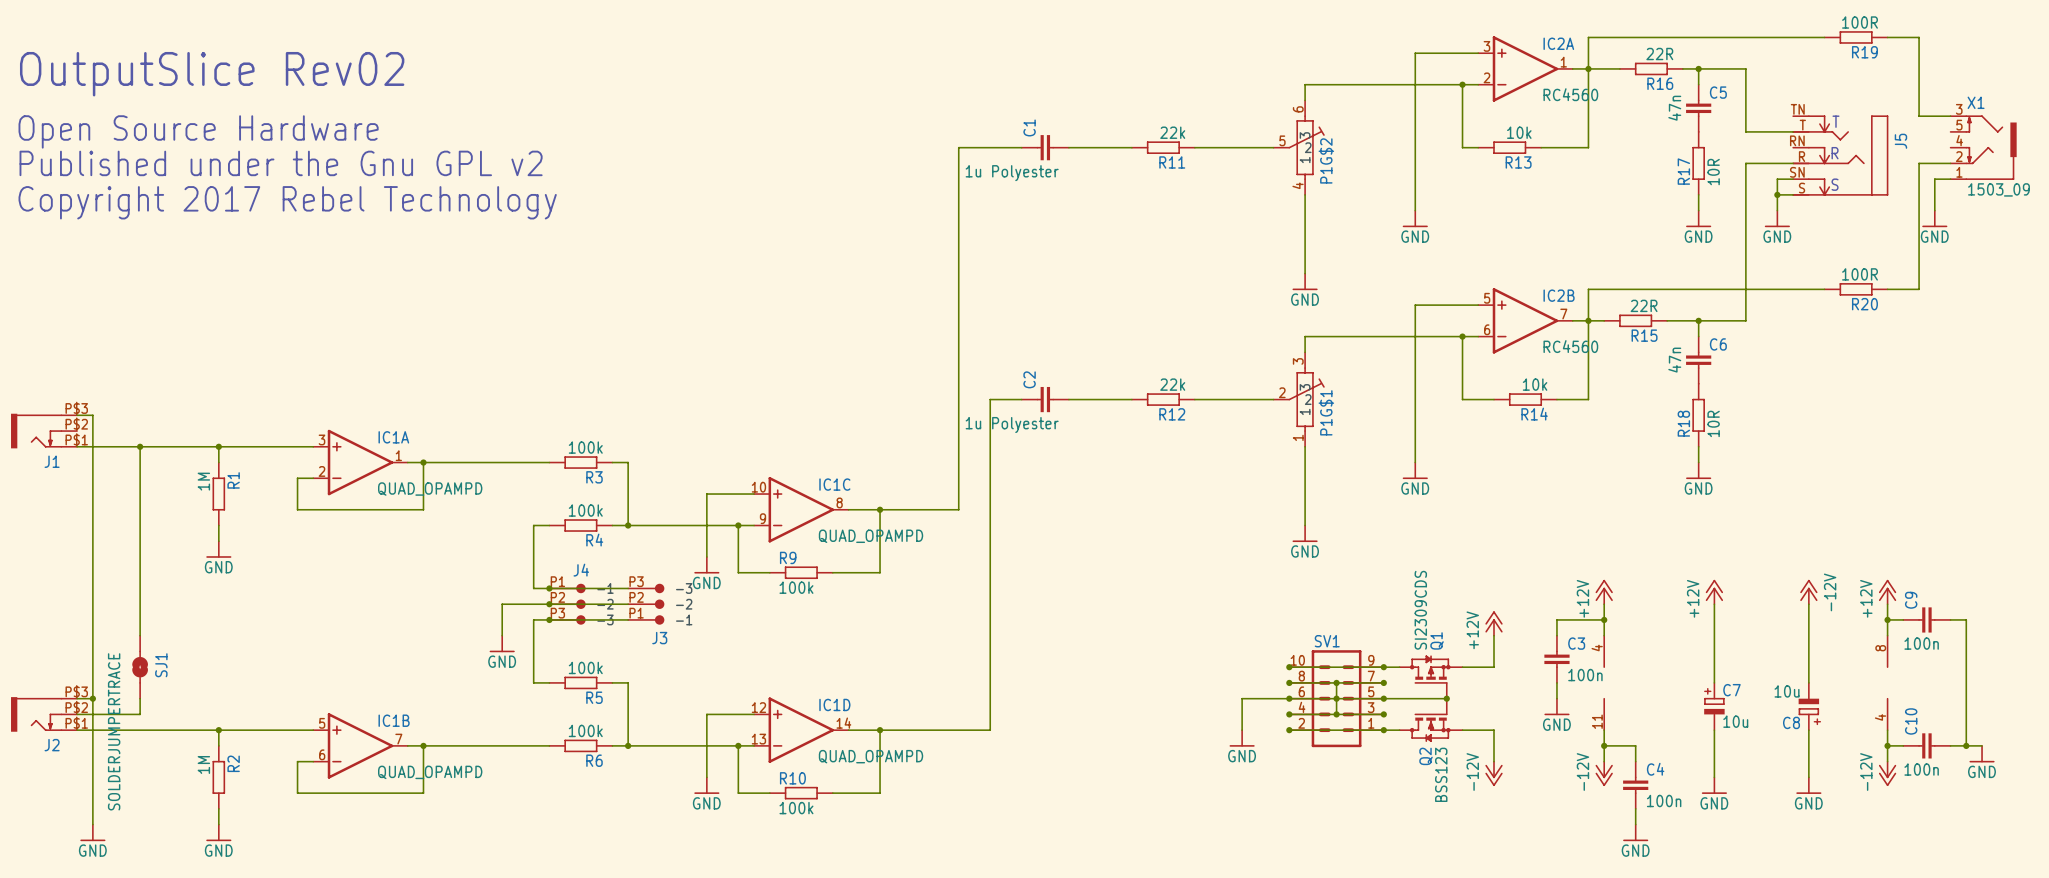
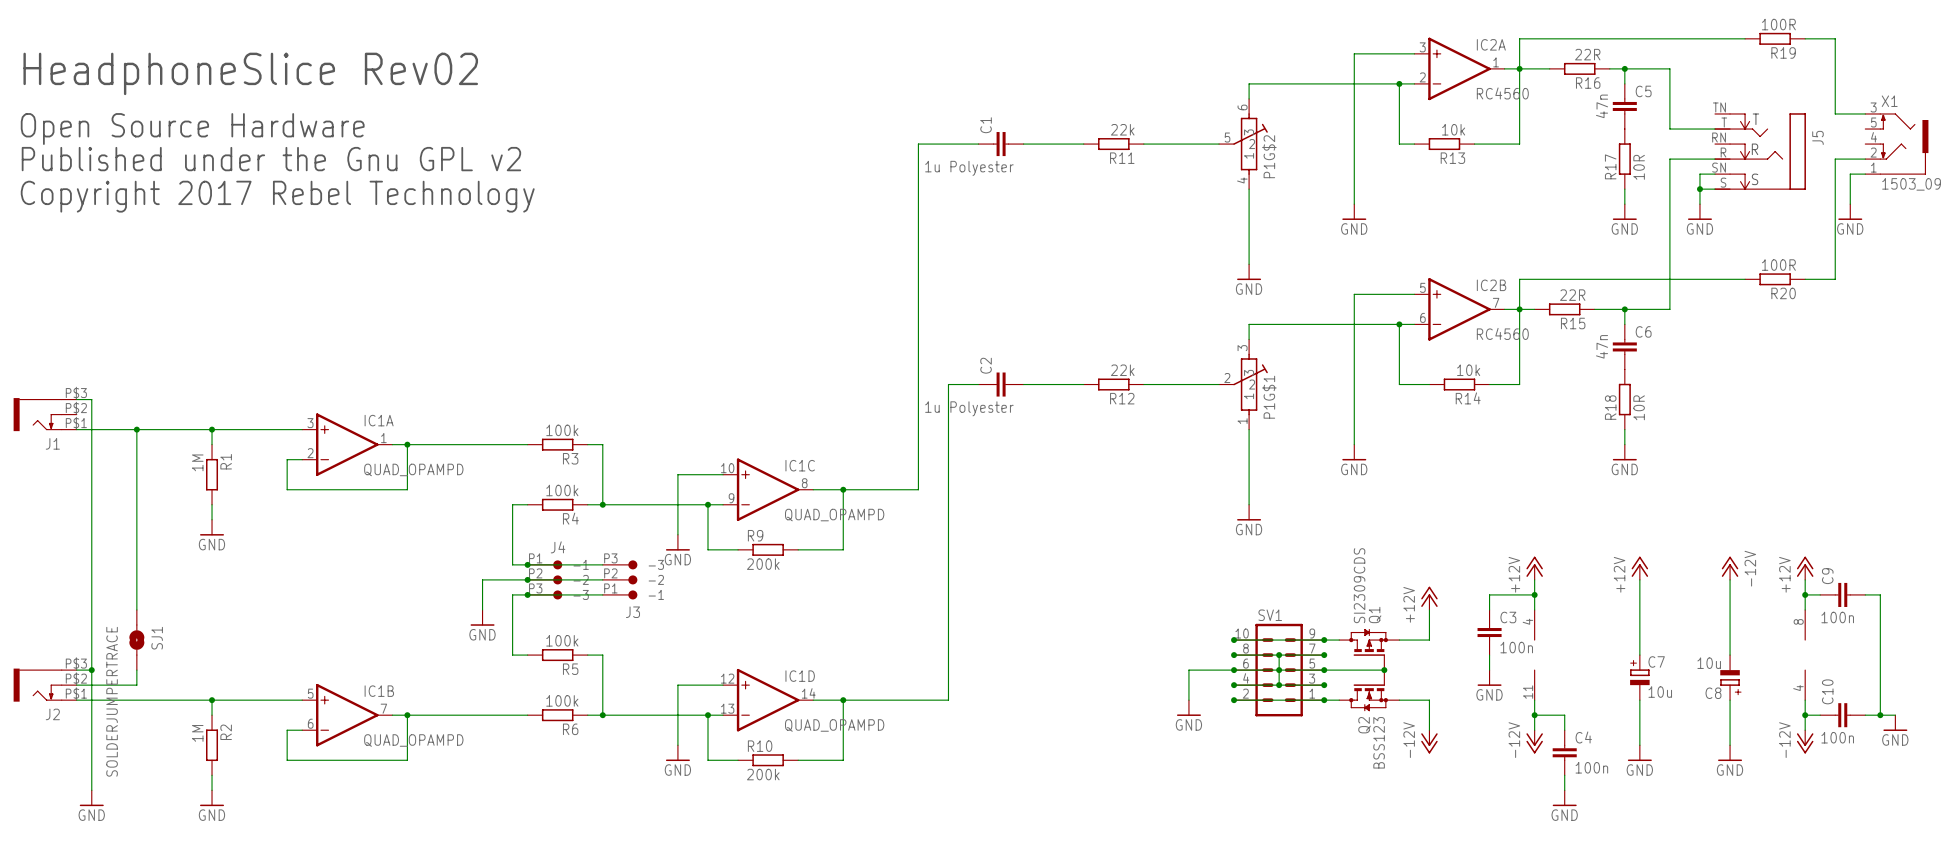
text: OutputSlice Rev02 (212, 74) -> HeadphoneSlice Rev02 (250, 73)
R9 value: 100k (796, 587) -> 200k (763, 564)
R10 value: 100k (796, 808) -> 200k (763, 774)

